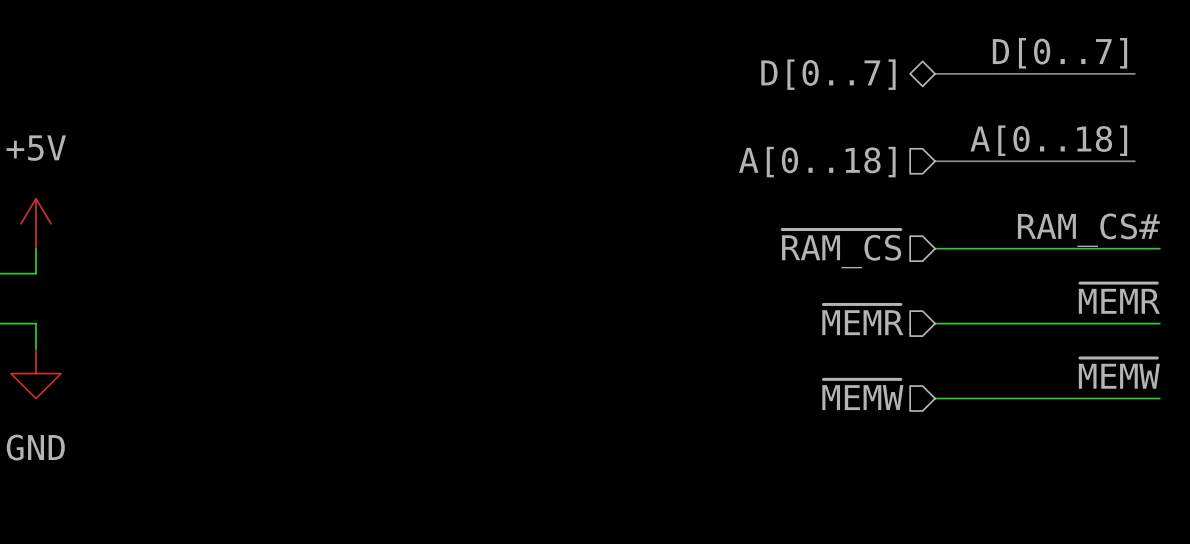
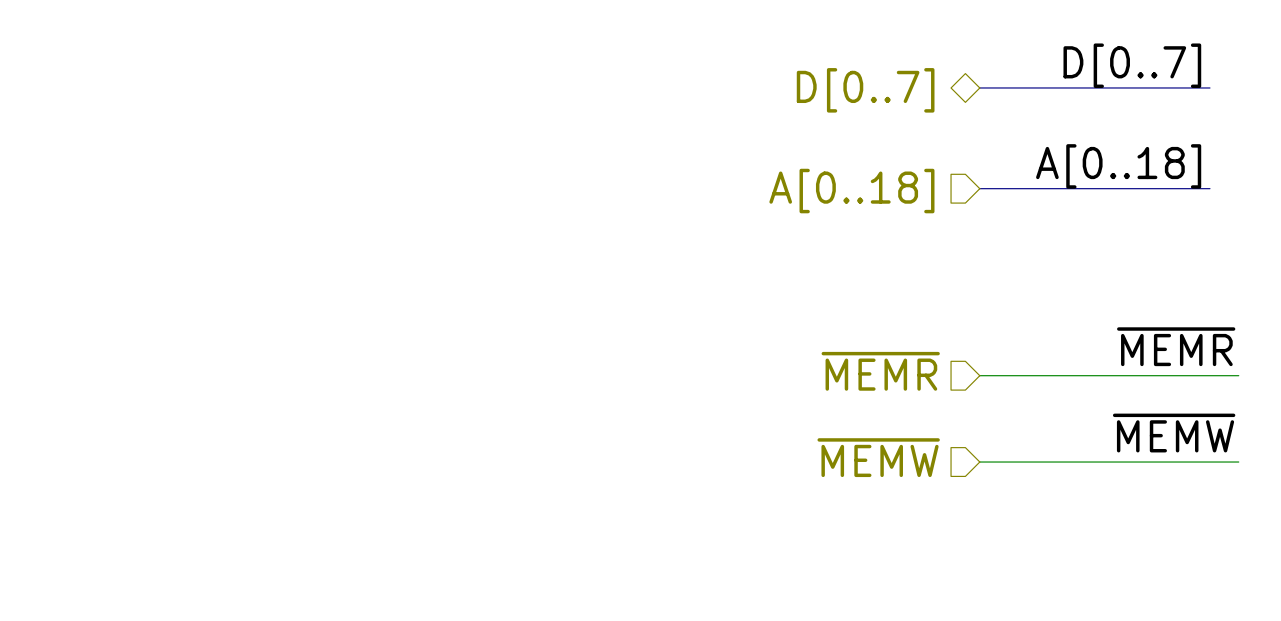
label: RAM_CS# (1088, 230) -> none
hierarchical label: ~{RAM_CS} (841, 248) -> none
wire: (935, 248) (1159, 248) -> none

